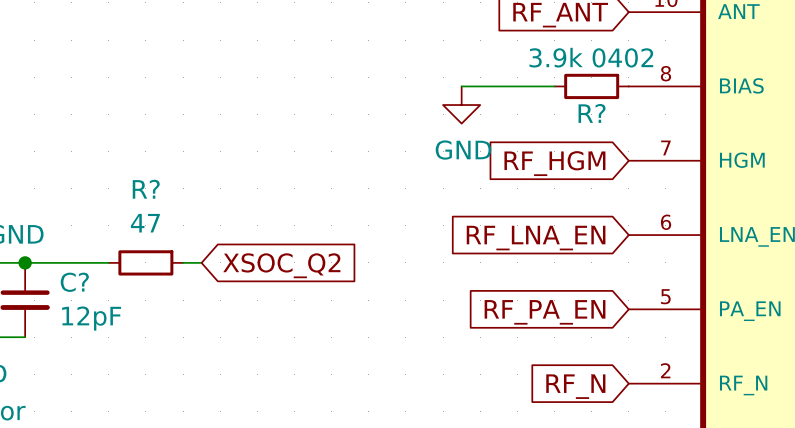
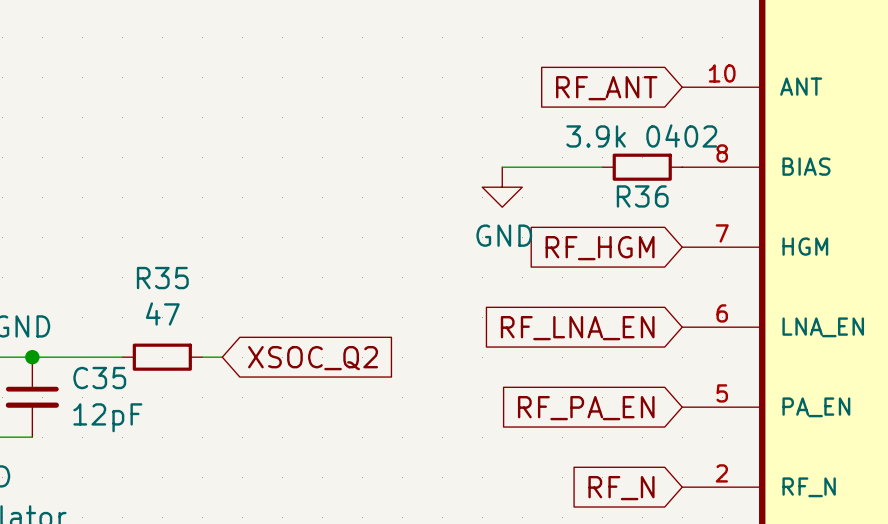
R? name: R? (592, 113) -> R36 (642, 196)
R? name: R? (146, 189) -> R35 (162, 278)
C? name: C? (74, 282) -> C35 (99, 378)

